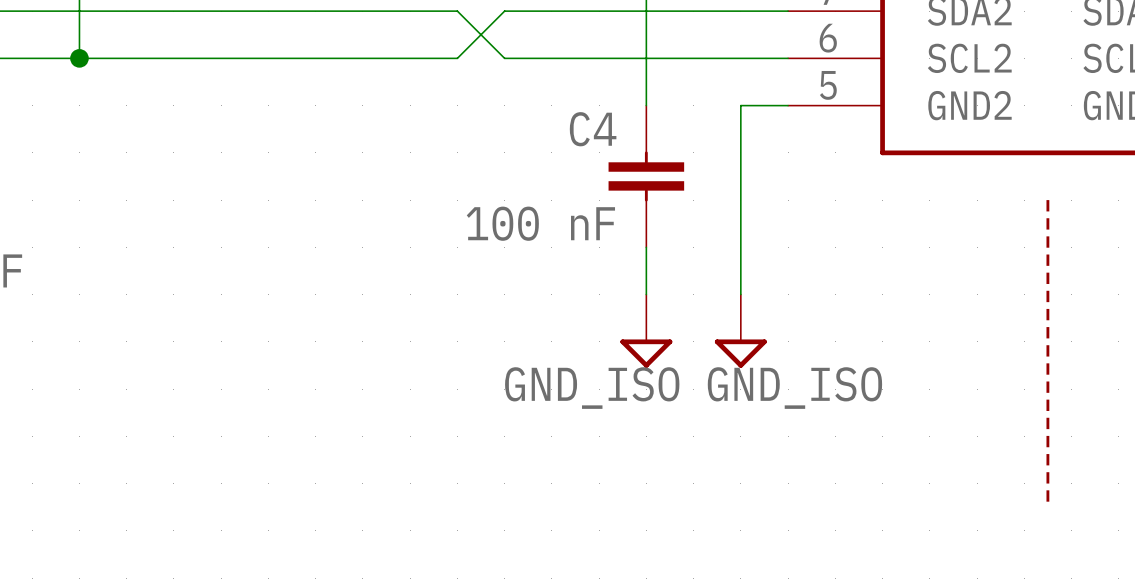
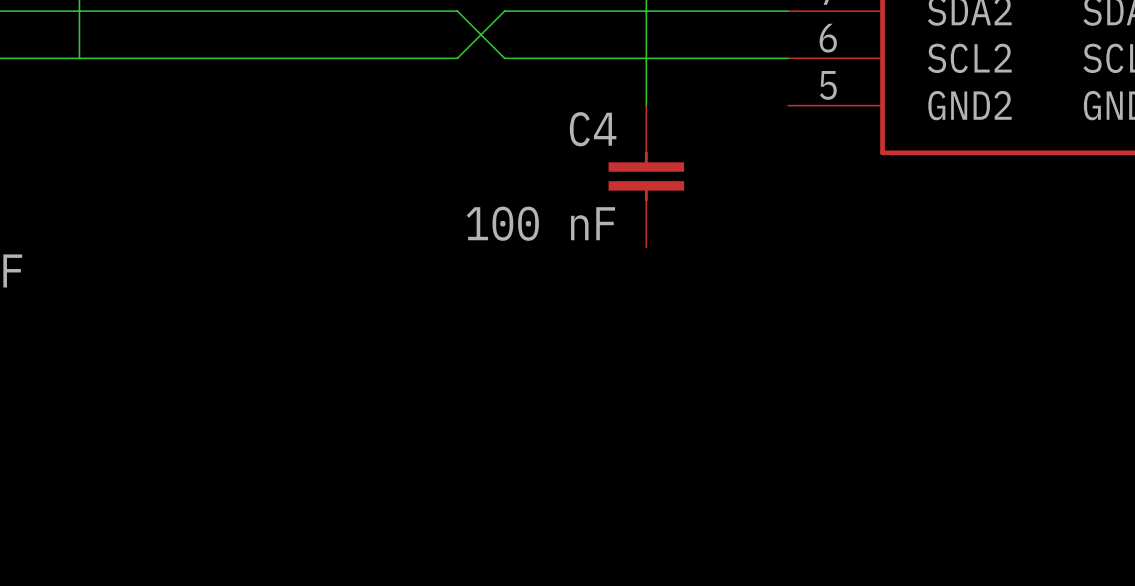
junction: (79, 58) -> none
wire: (788, 105) (740, 105) (740, 294) -> none
line: (1047, 200) (1047, 502) -> none
wire: (646, 247) (646, 294) -> none
power symbol: GND_ISO (646, 331) -> none
power symbol: GND_ISO (740, 331) -> none

